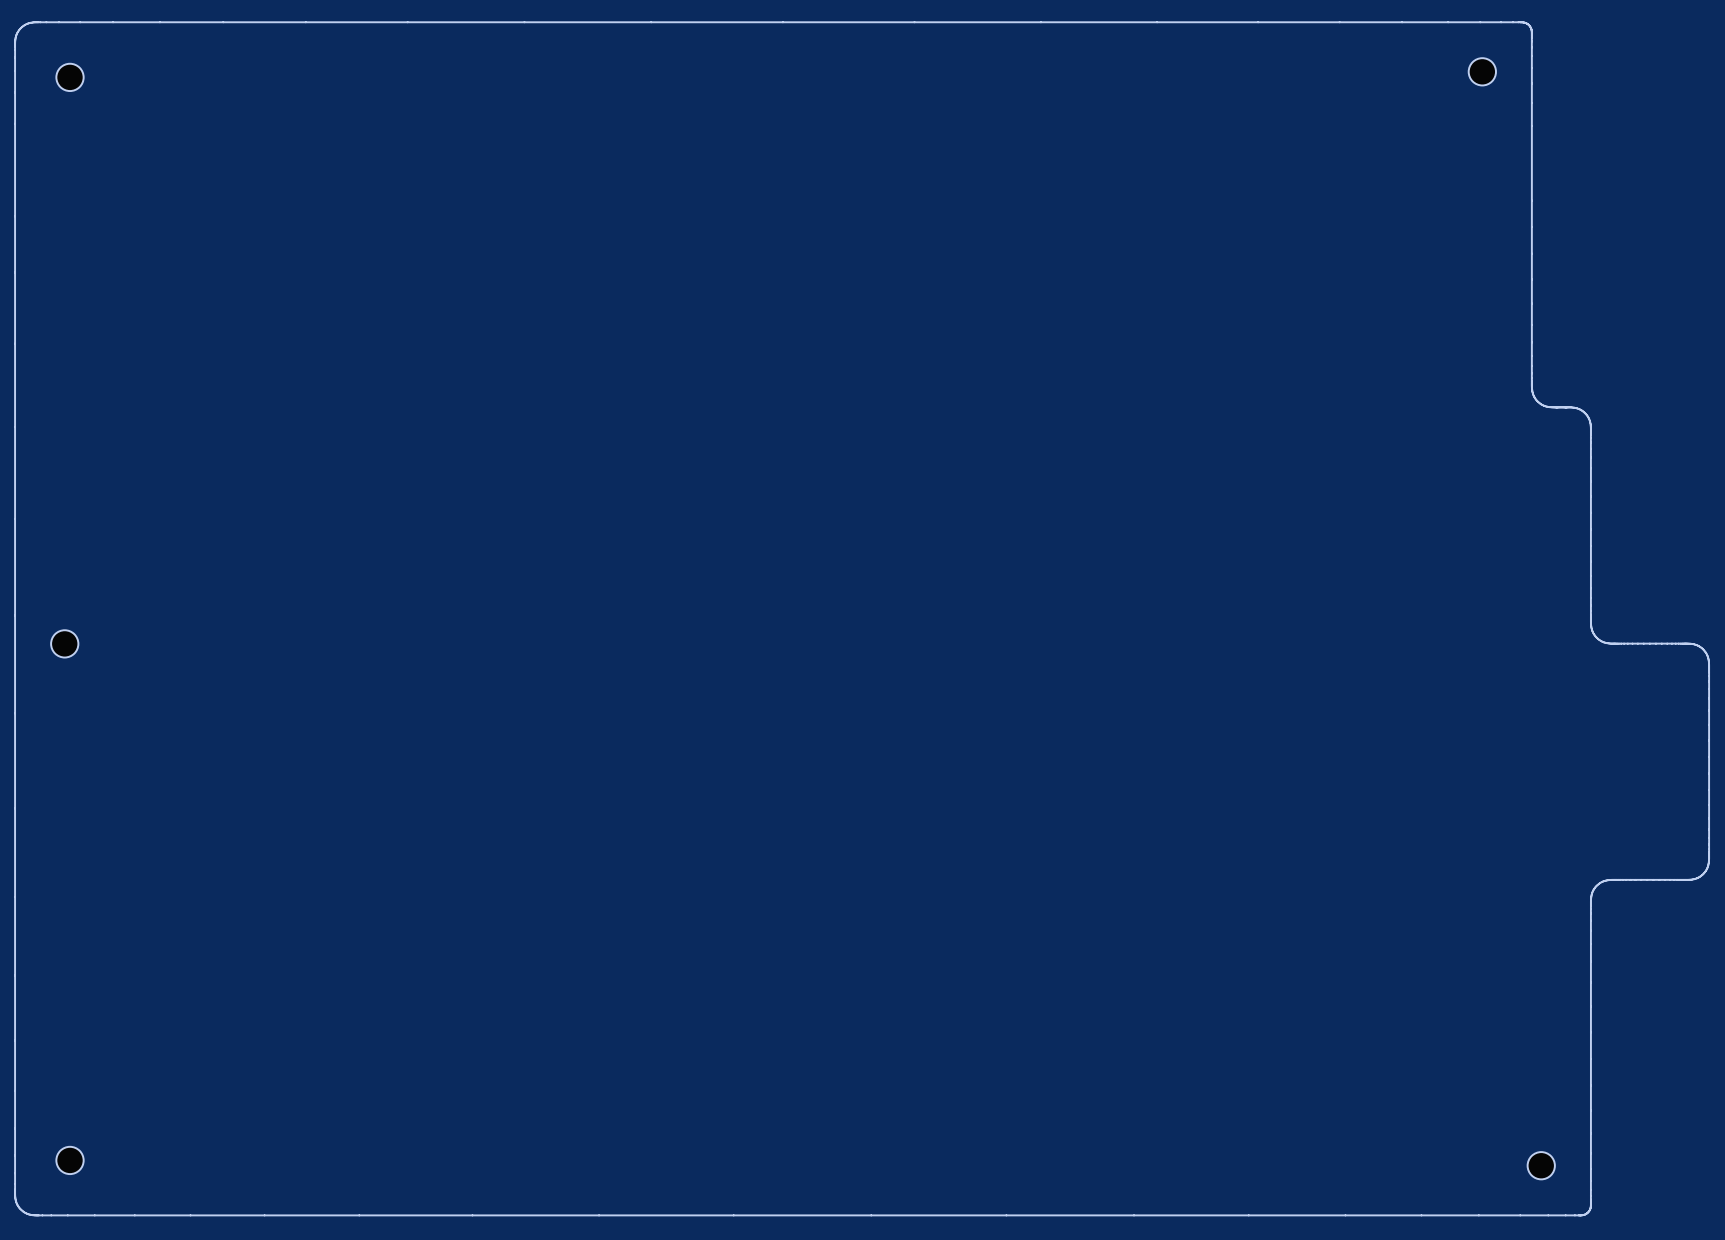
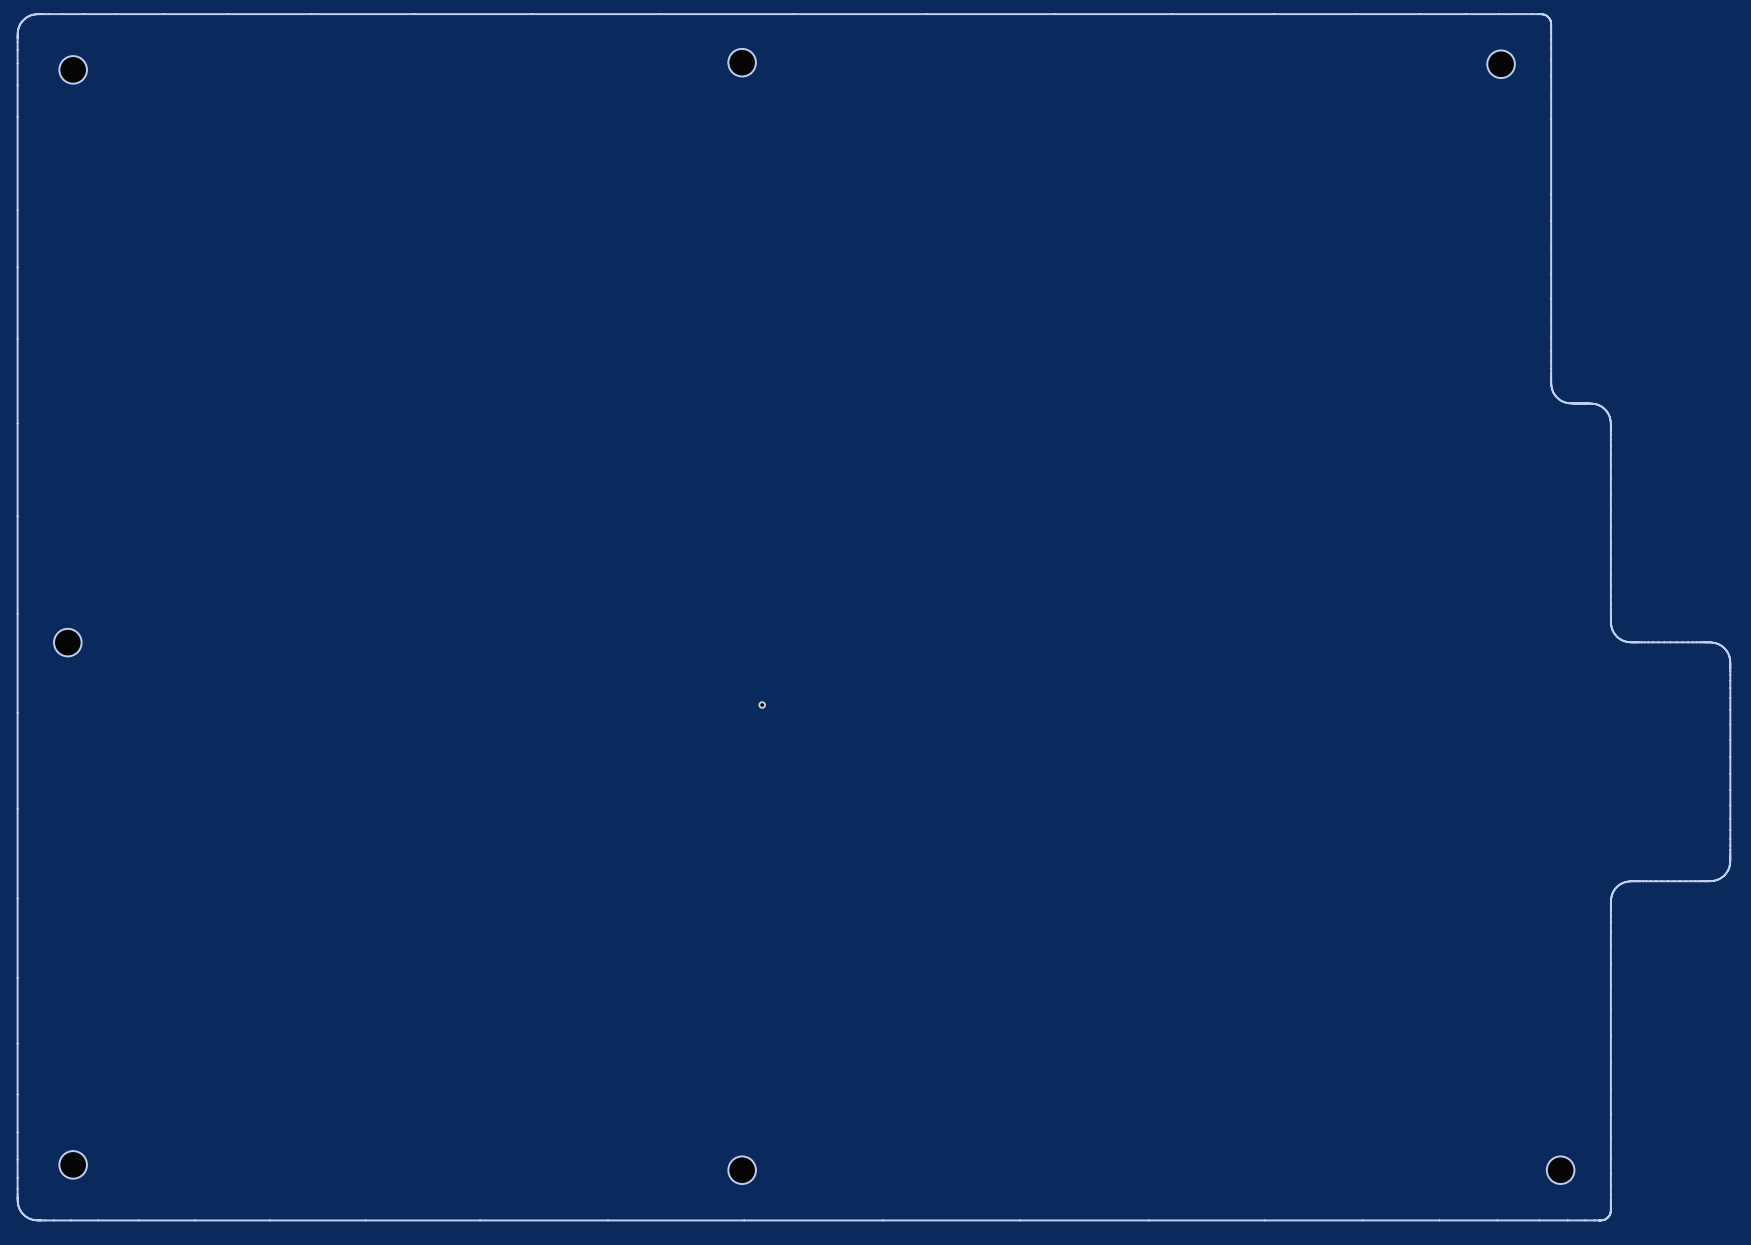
part: none -> (742, 62)
part: none -> (762, 705)
part: none -> (742, 1170)

